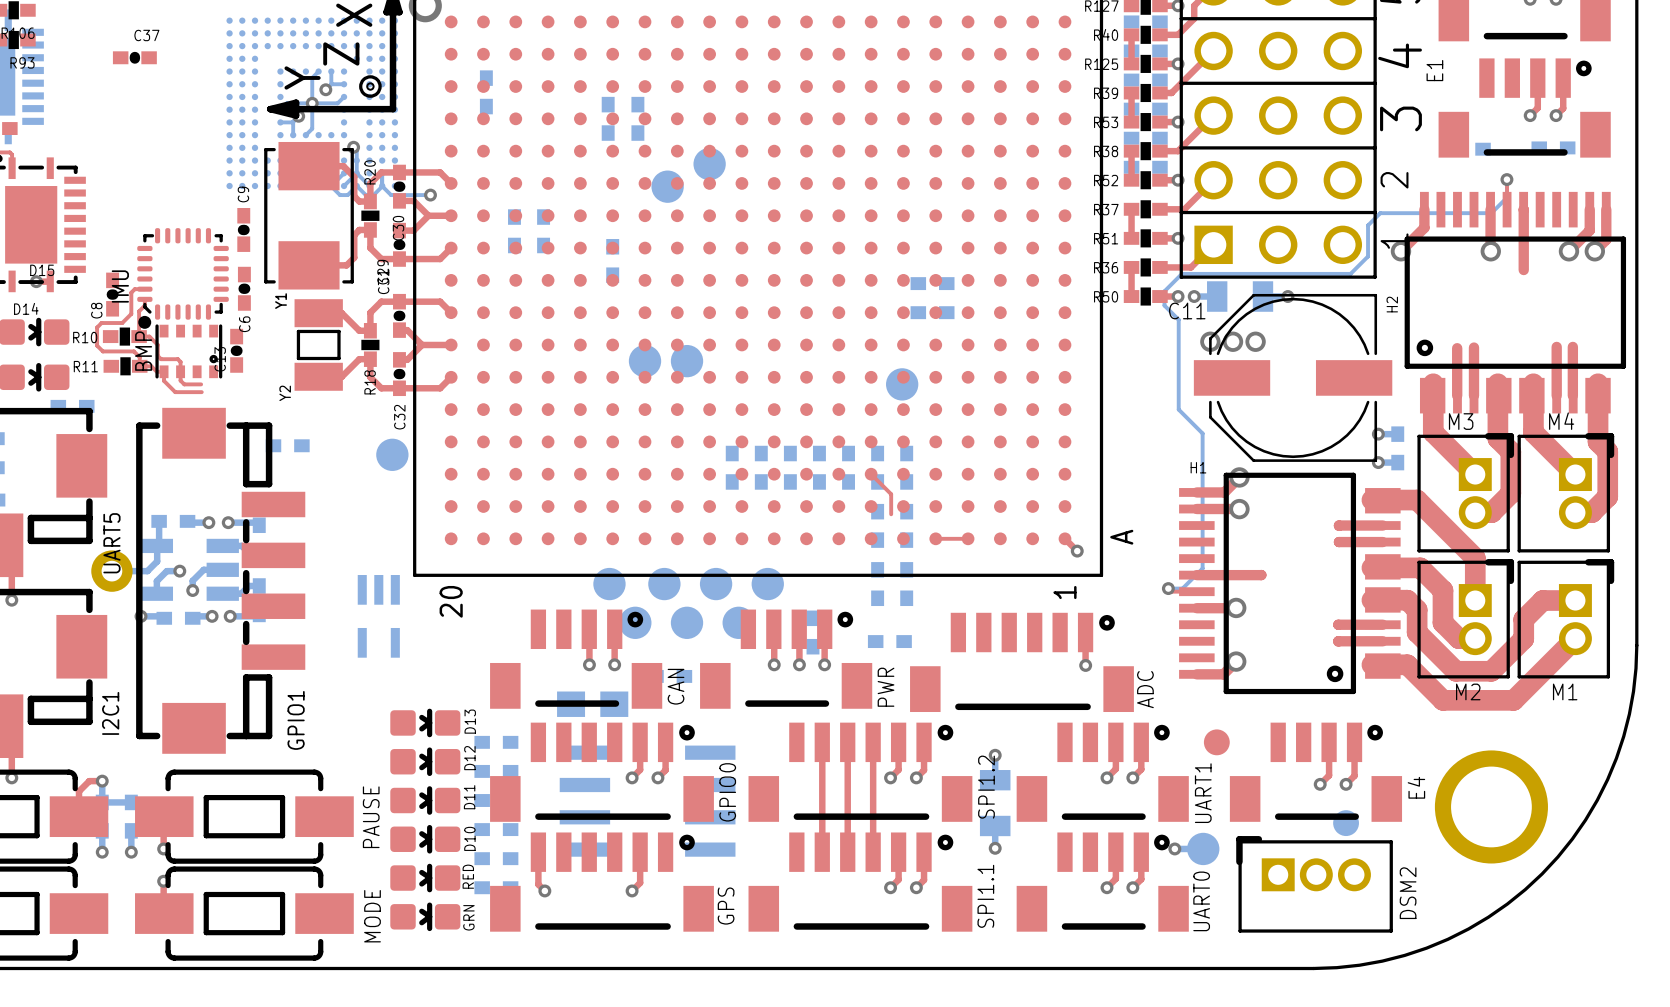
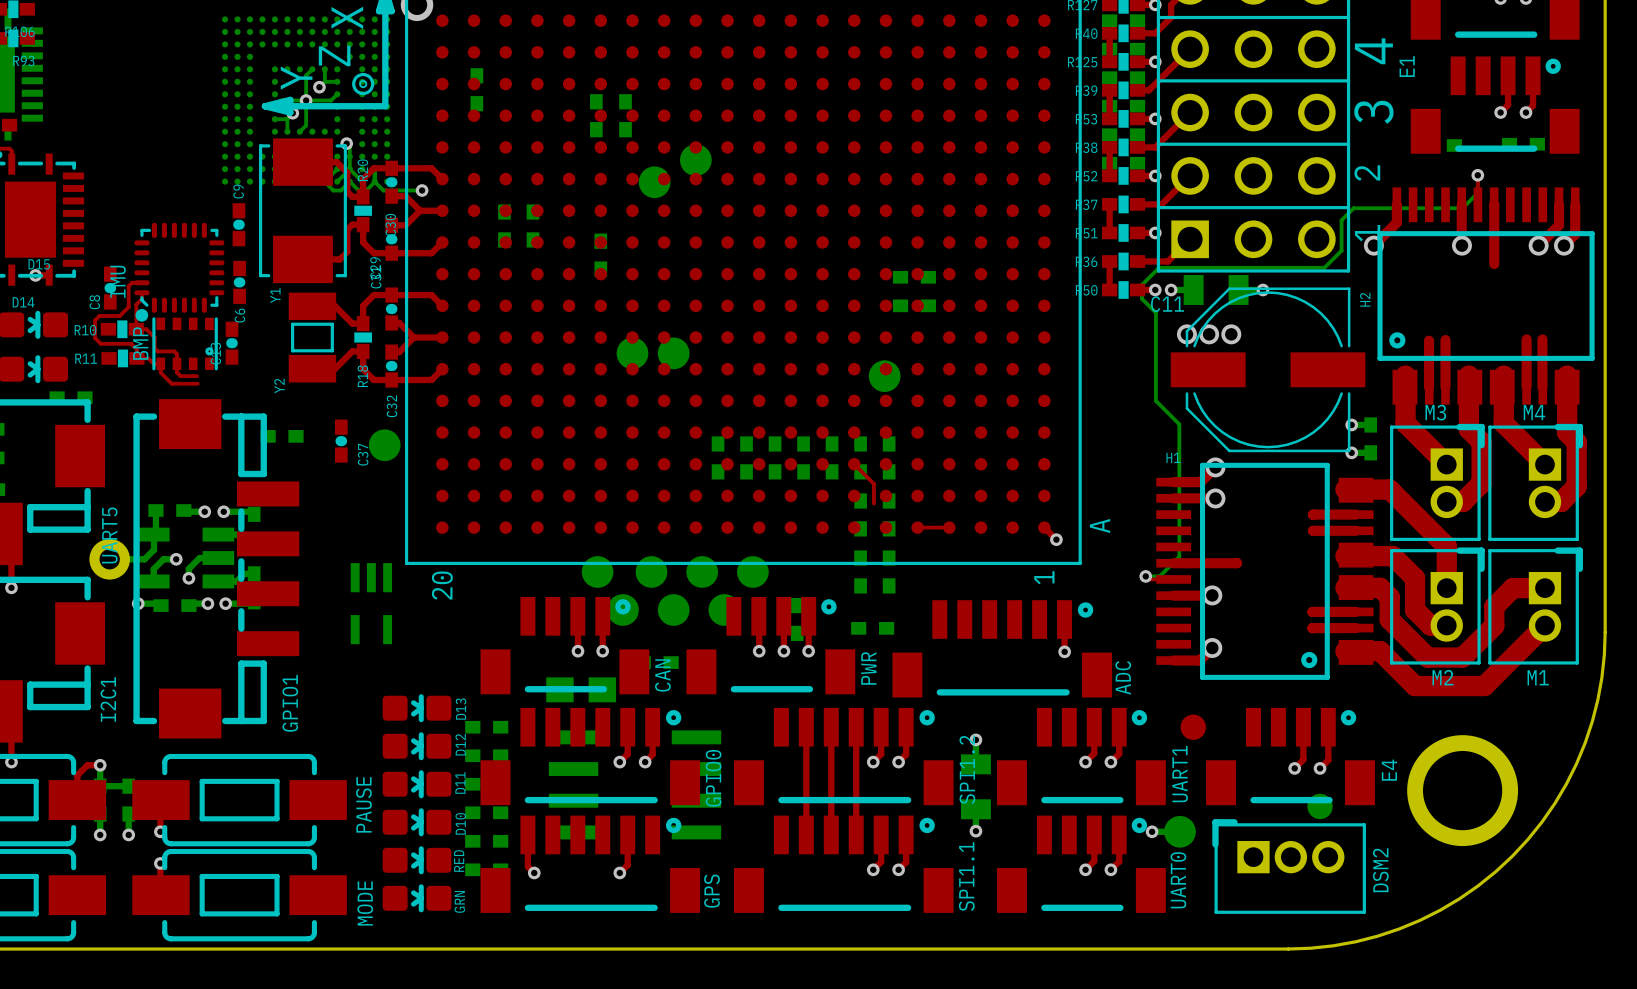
C37 rotation: 0° (134, 57) -> 90° clockwise (341, 441)
C37 position: (134, 57) -> (341, 441)

